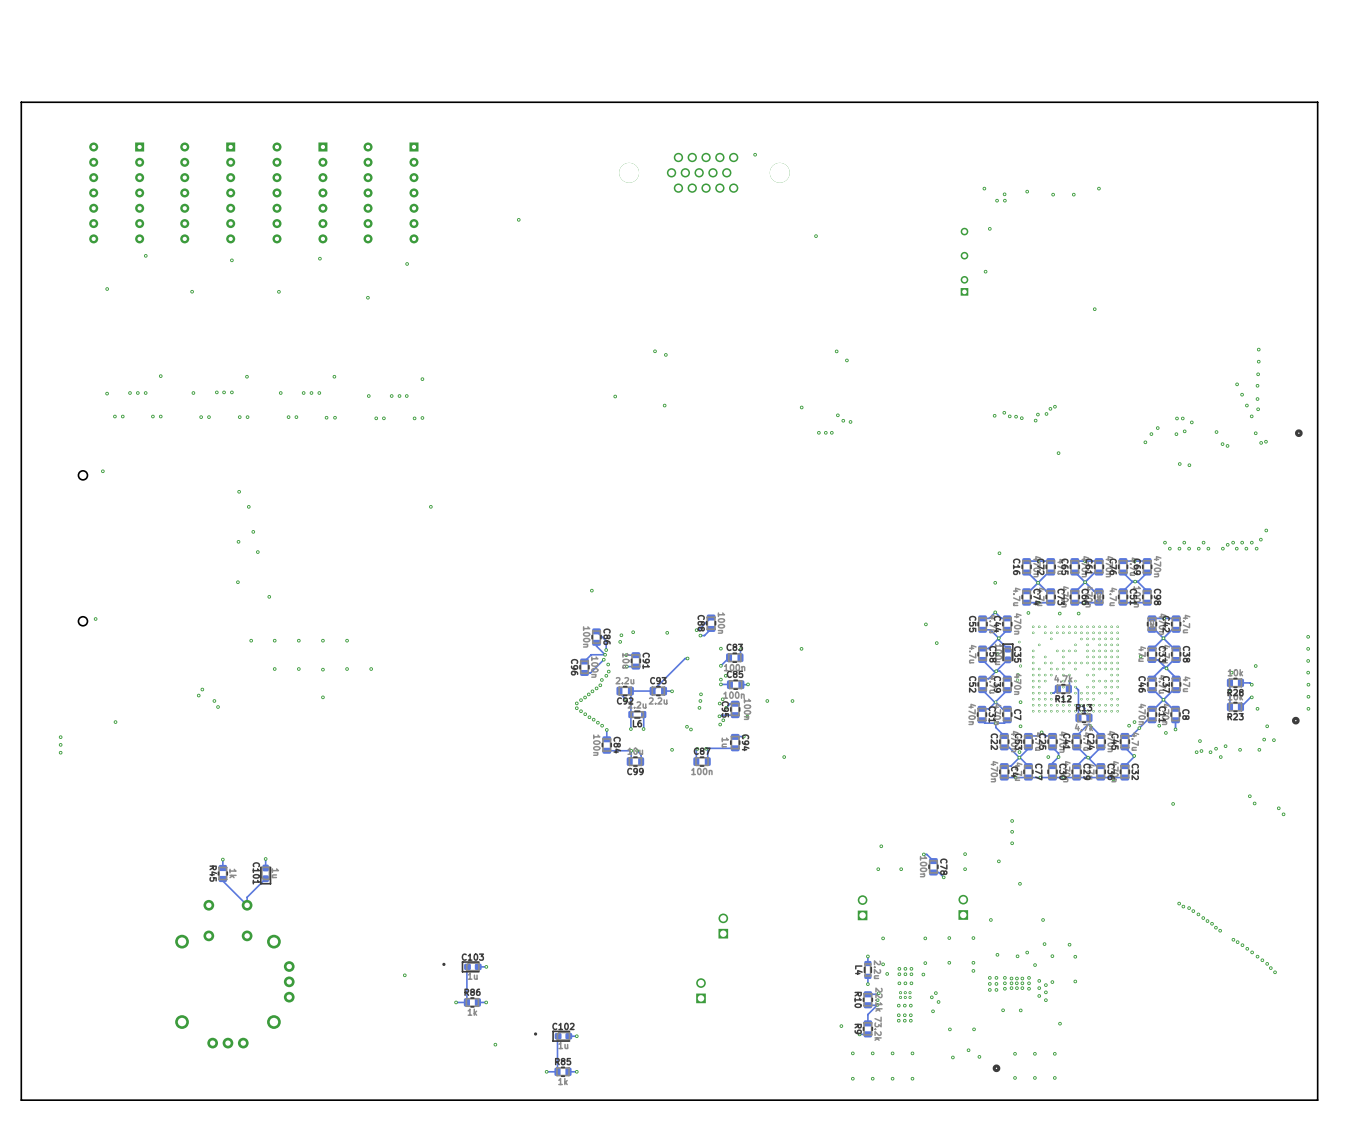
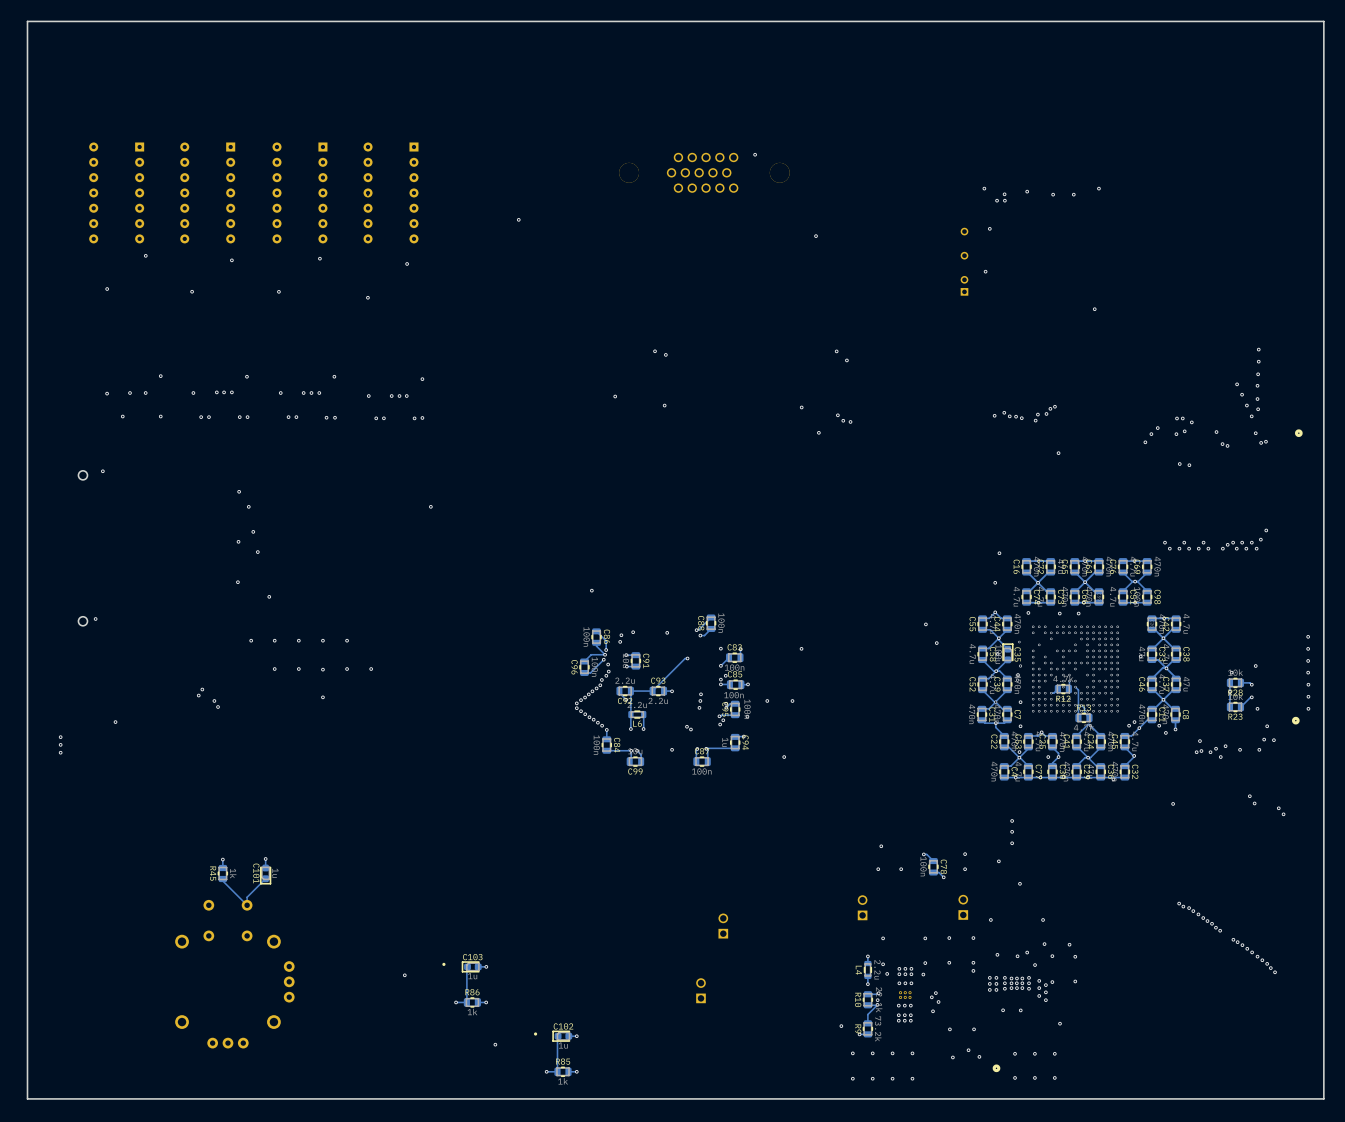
board edge: (1317, 102) (21, 102) (21, 1100) (1317, 1100) (1317, 102) -> (1323, 21) (1323, 1098) (27, 1098) (27, 21) (1323, 21)
via: (137, 393) -> none
via: (114, 416) -> none
via: (152, 416) -> none
via: (825, 432) -> none
via: (831, 432) -> none
via: (722, 699) -> none
via: (719, 703) -> none
via: none -> (726, 703)

